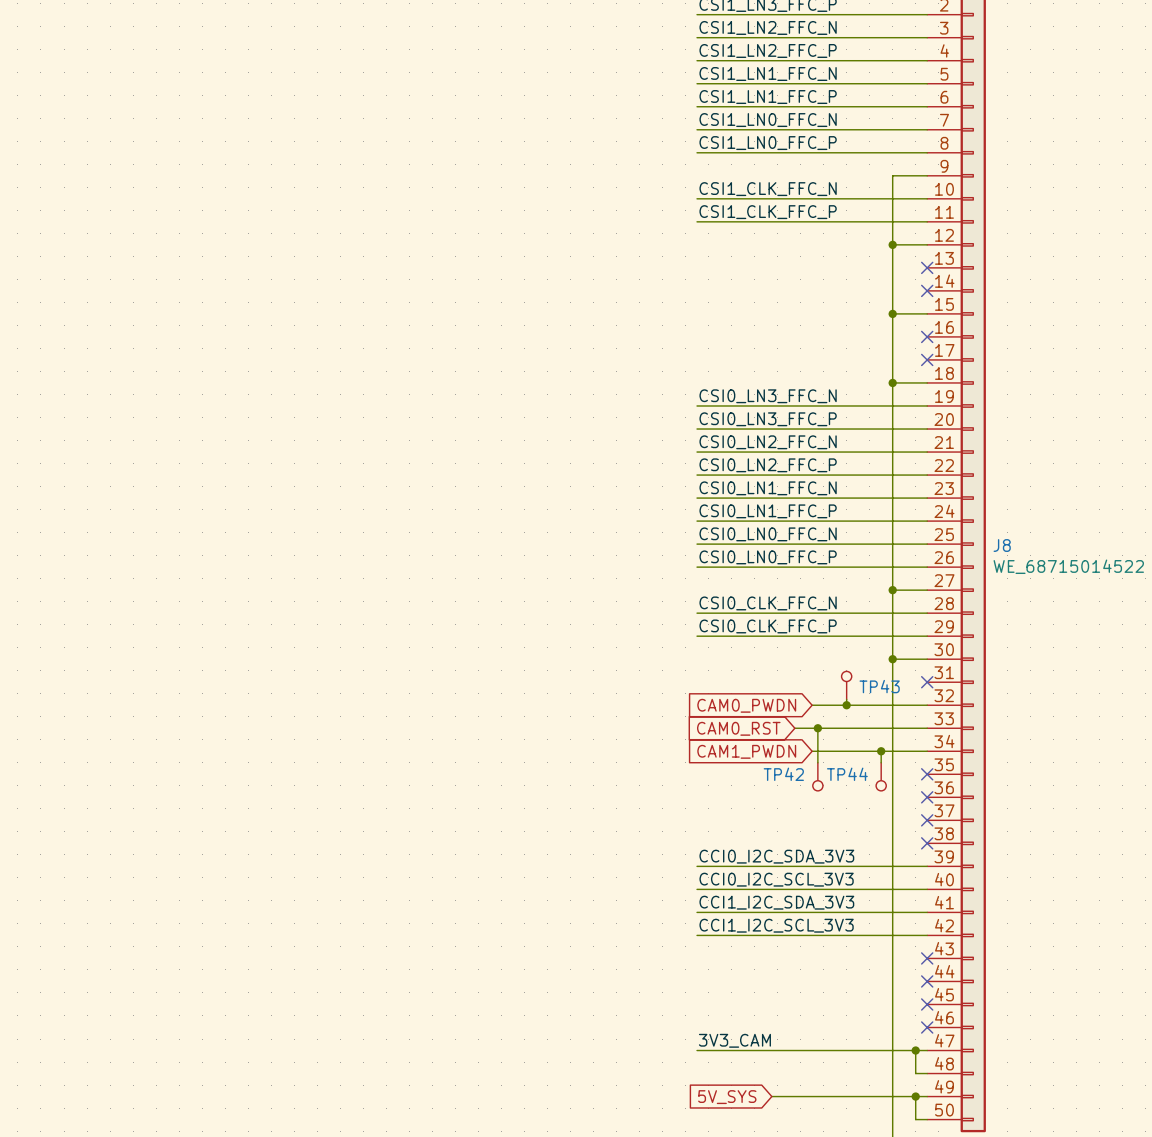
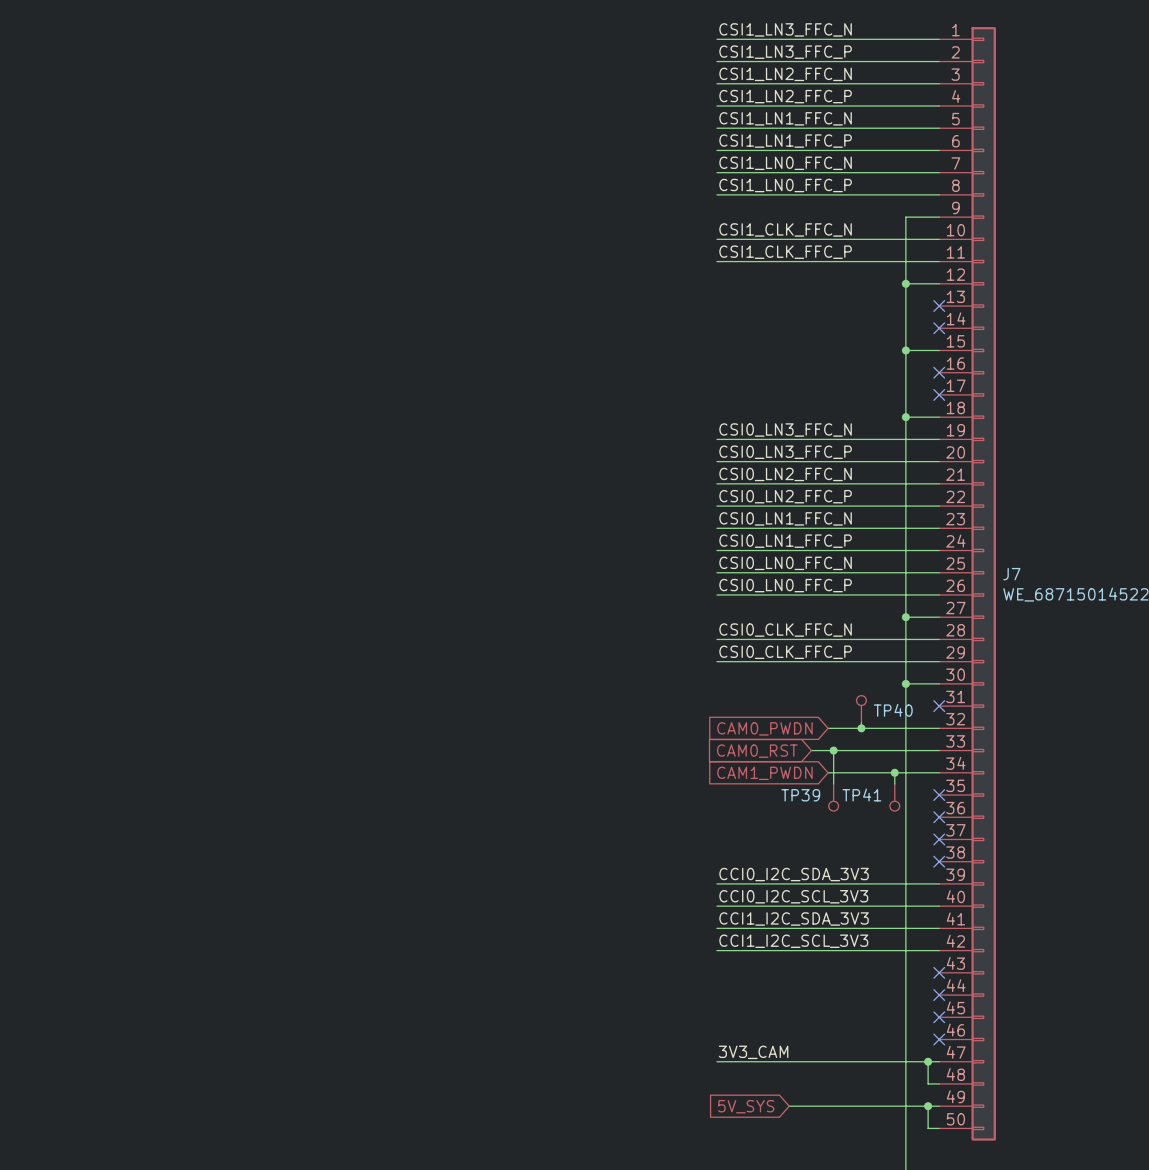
J8 name: J8 (1002, 545) -> J7 (1011, 574)
TP43 name: TP43 (879, 686) -> TP40 (893, 710)
TP42 name: TP42 (783, 774) -> TP39 (800, 795)
TP44 name: TP44 (847, 774) -> TP41 (861, 795)

